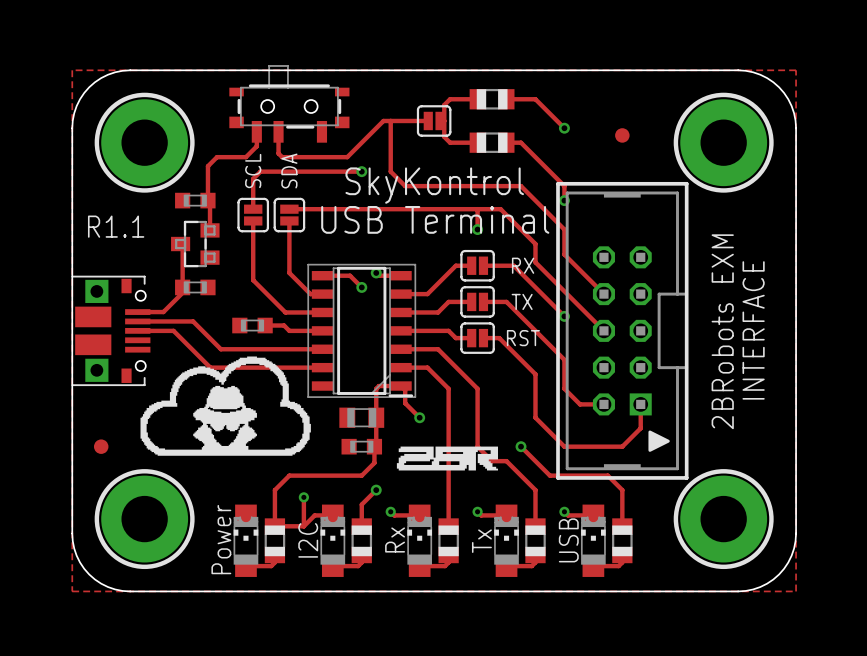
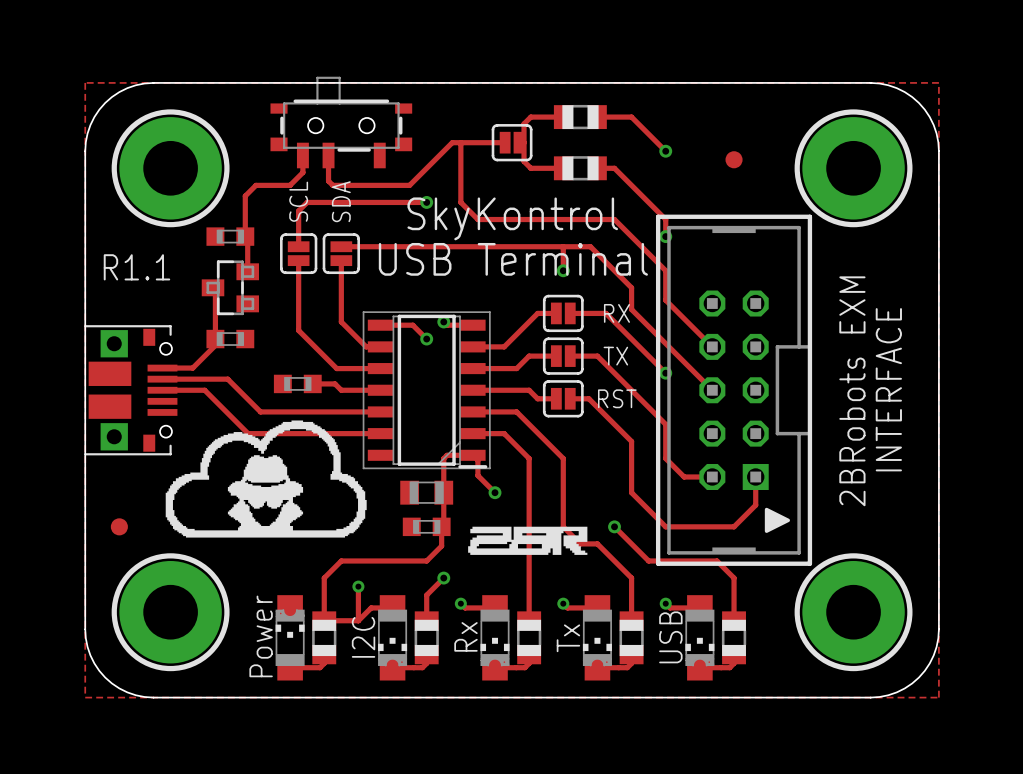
part rotation: 0° (332, 540) -> 180° (392, 637)
part rotation: 0° (419, 540) -> 180° (495, 637)
part rotation: 0° (506, 540) -> 180° (597, 637)
part rotation: 0° (593, 540) -> 180° (699, 637)

